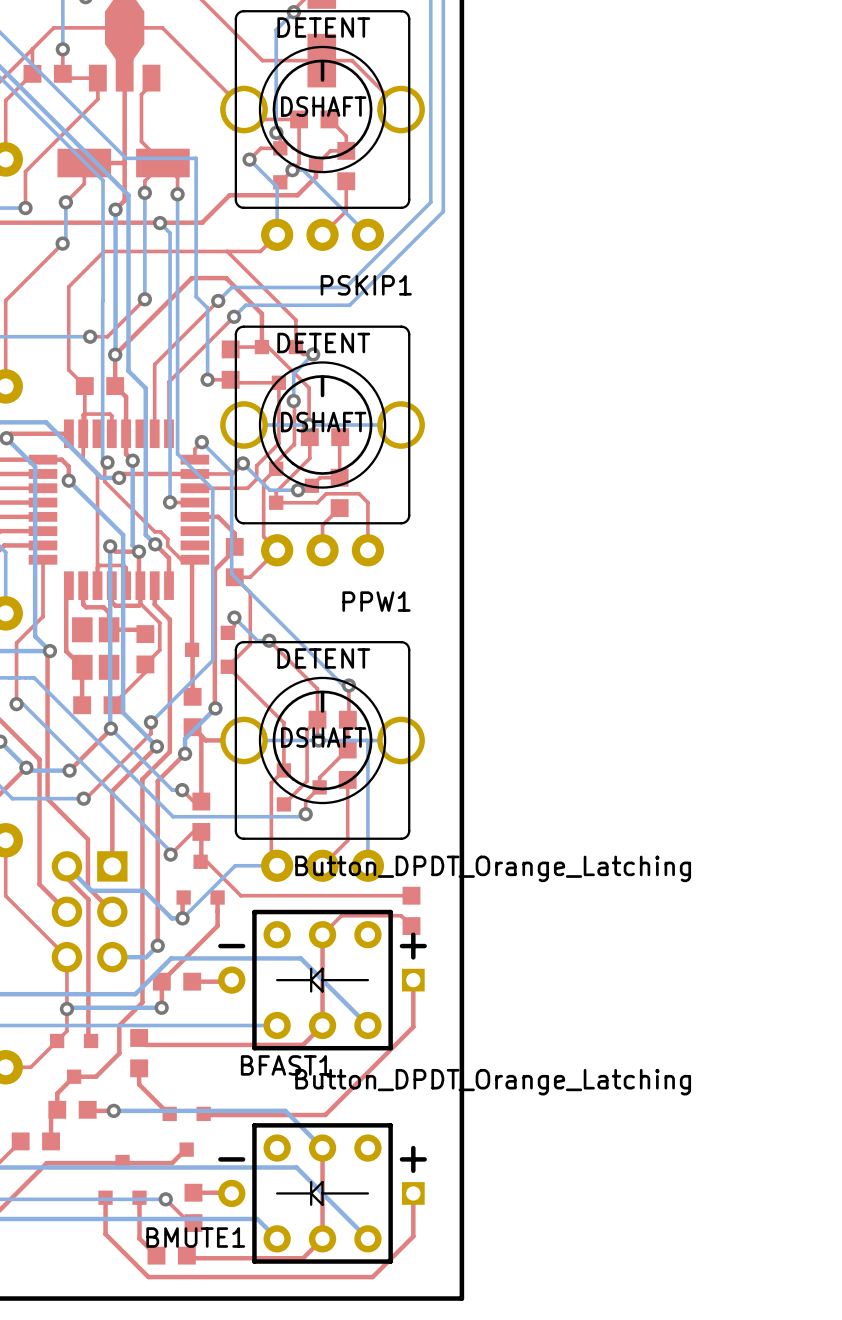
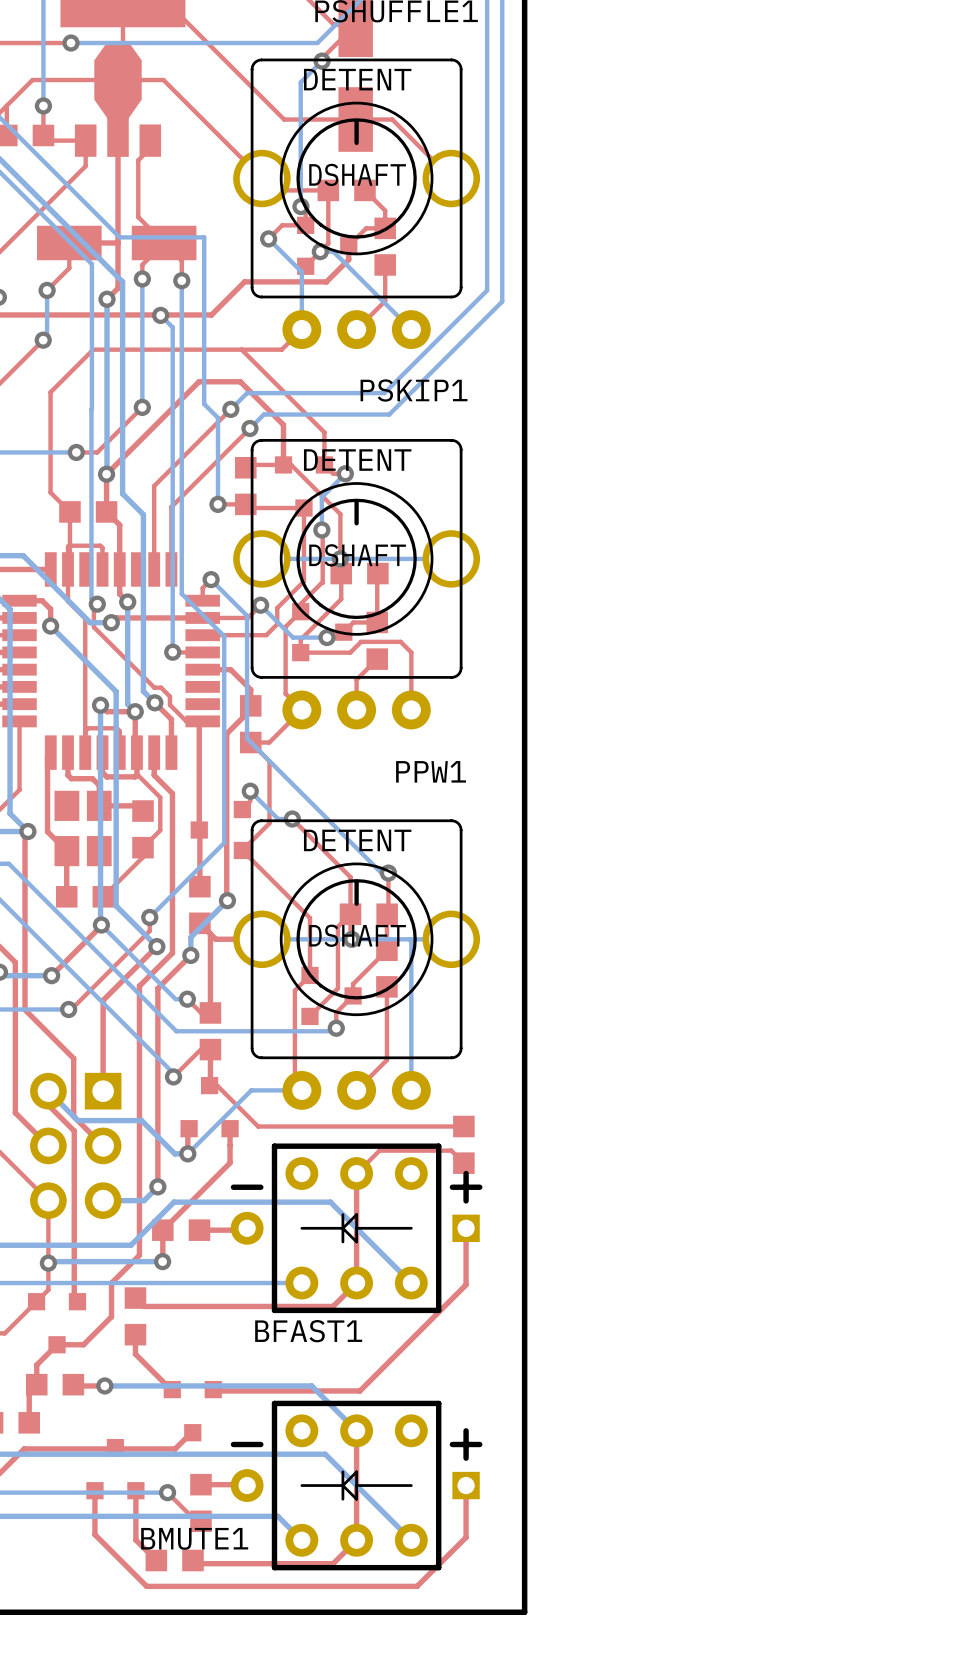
BFAST1 value: Button_DPDT_Orange_Latching (493, 868) -> none
BMUTE1 value: Button_DPDT_Orange_Latching (493, 1082) -> none

